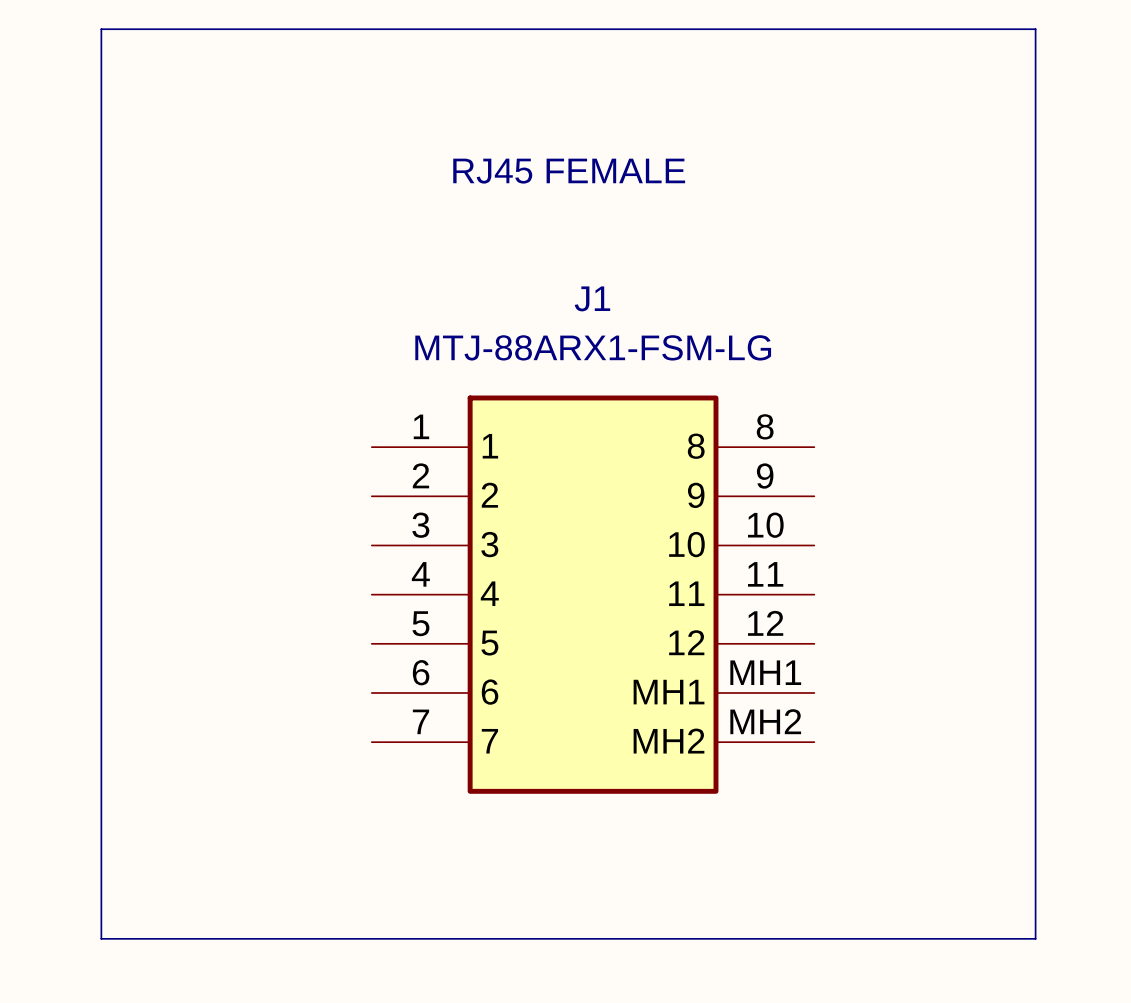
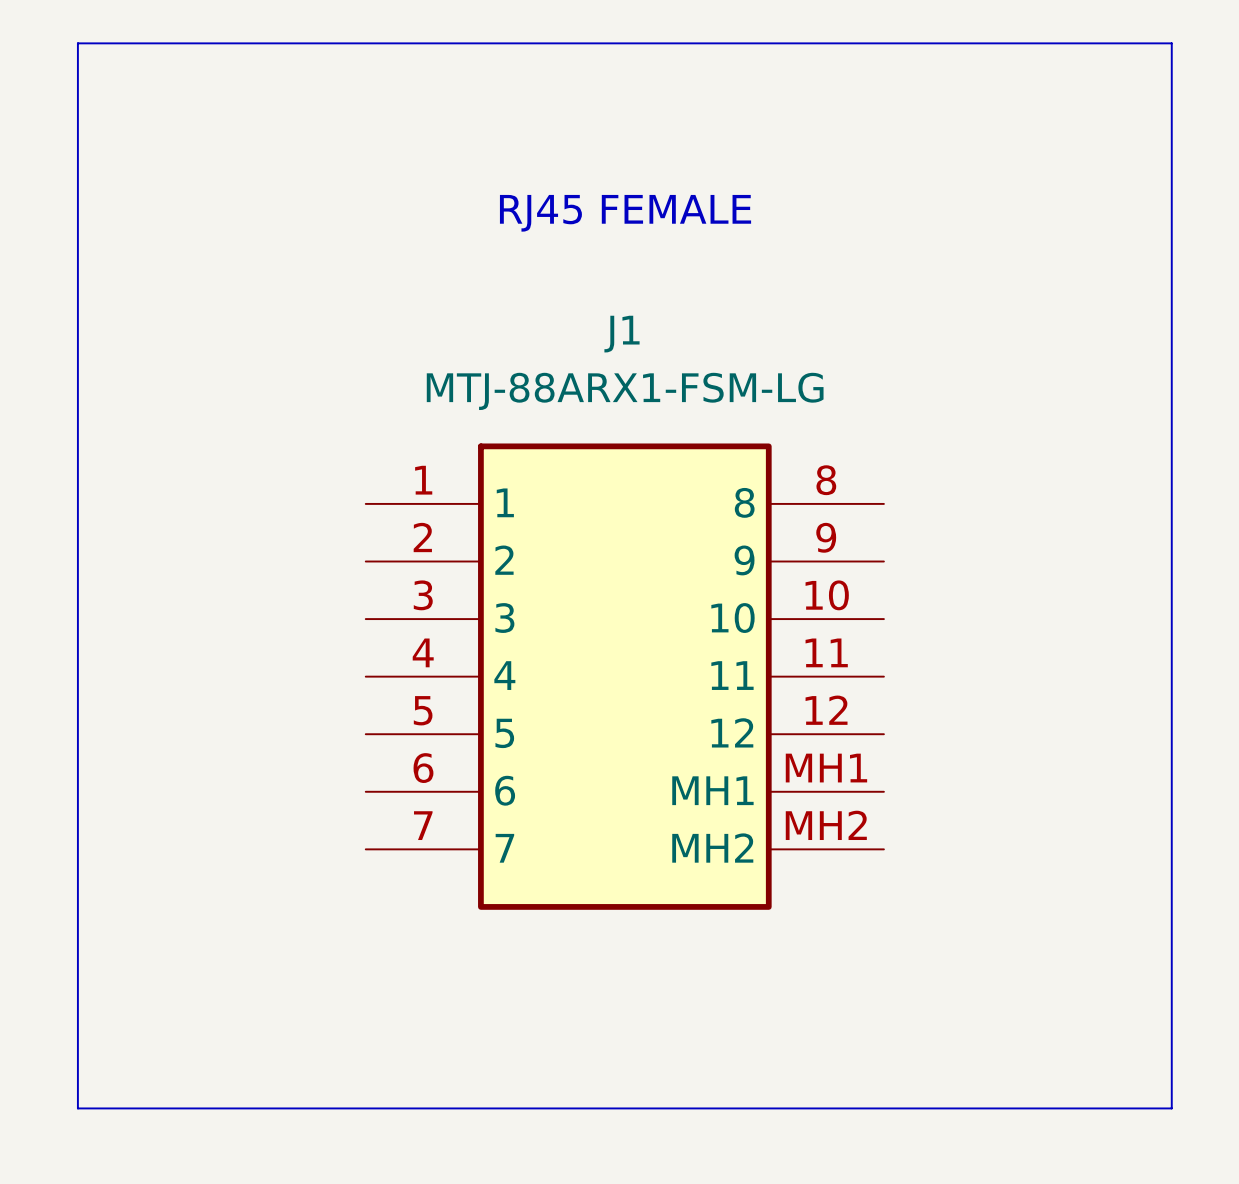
J1 position: (593, 594) -> (624, 676)

